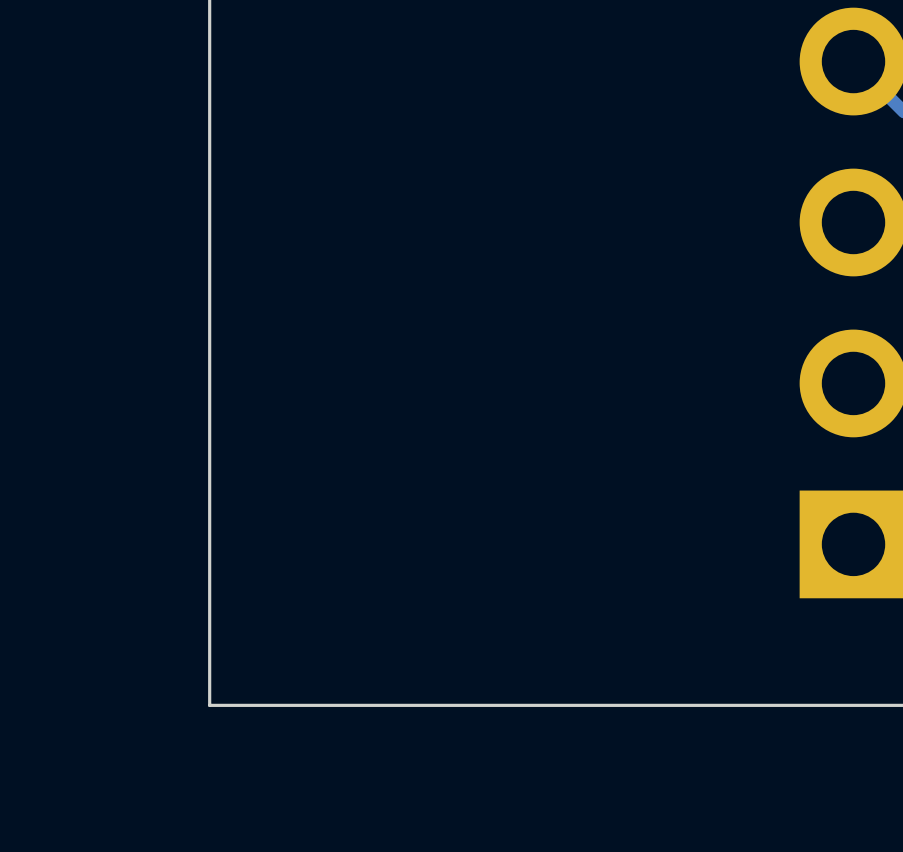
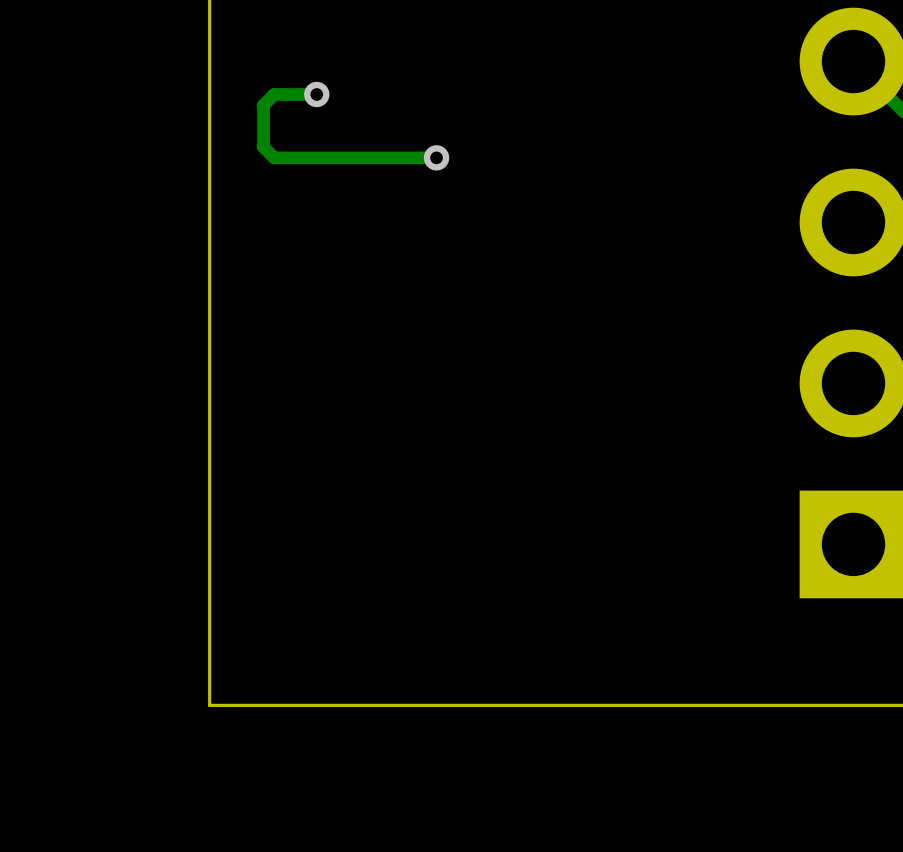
track: none -> (316, 94) (274, 94) (263, 105) (263, 147) (274, 157) (436, 157)
via: none -> (316, 94)
via: none -> (436, 157)

